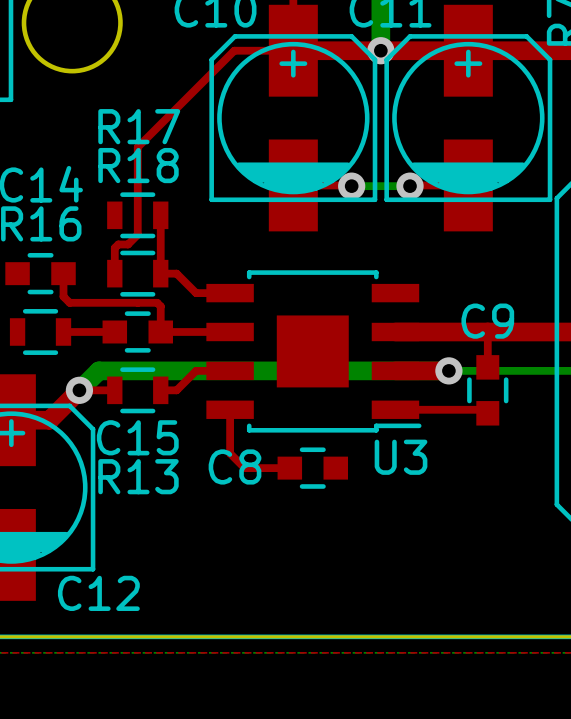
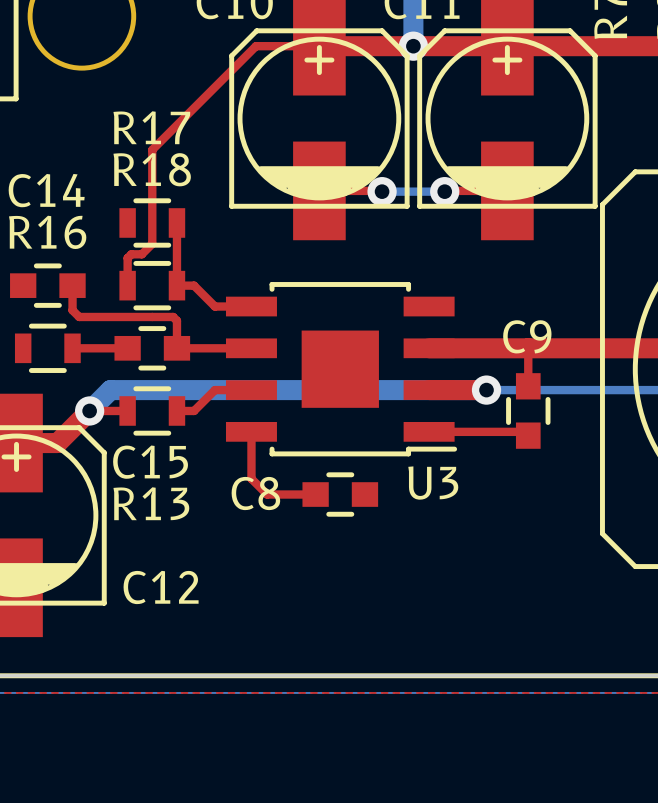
C12 name position: C12 (98, 593) -> C12 (161, 587)

